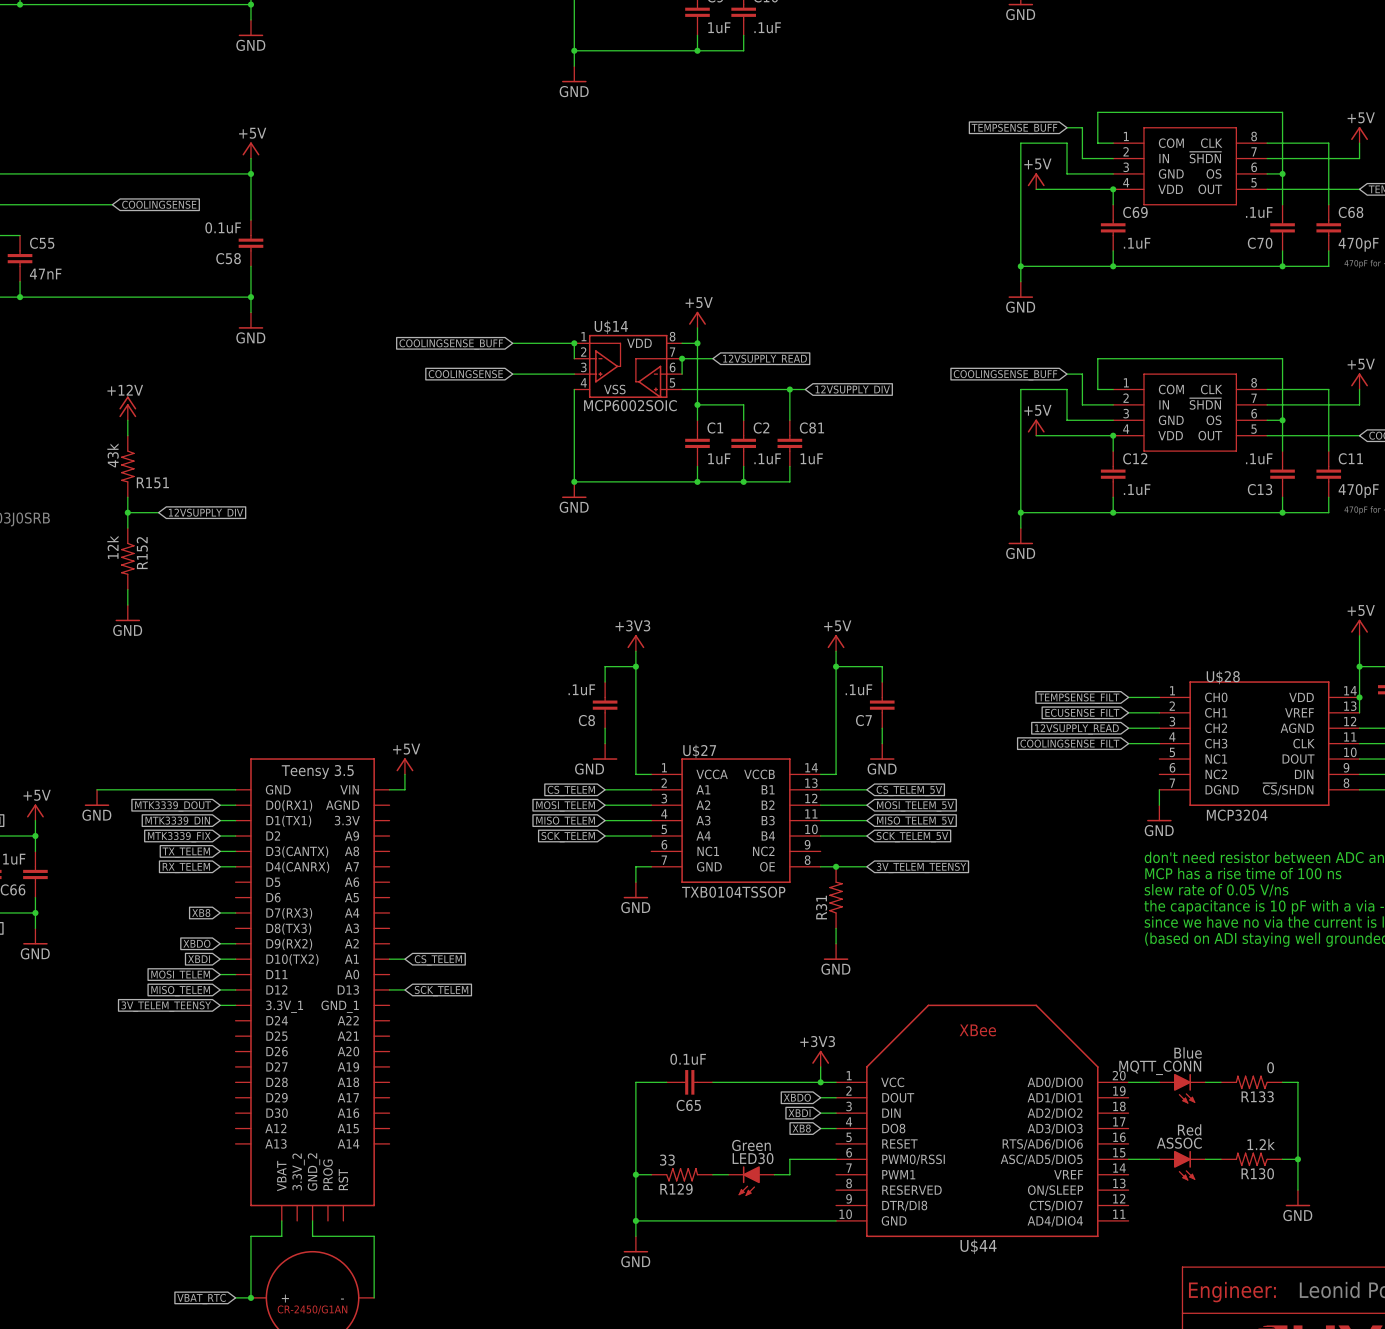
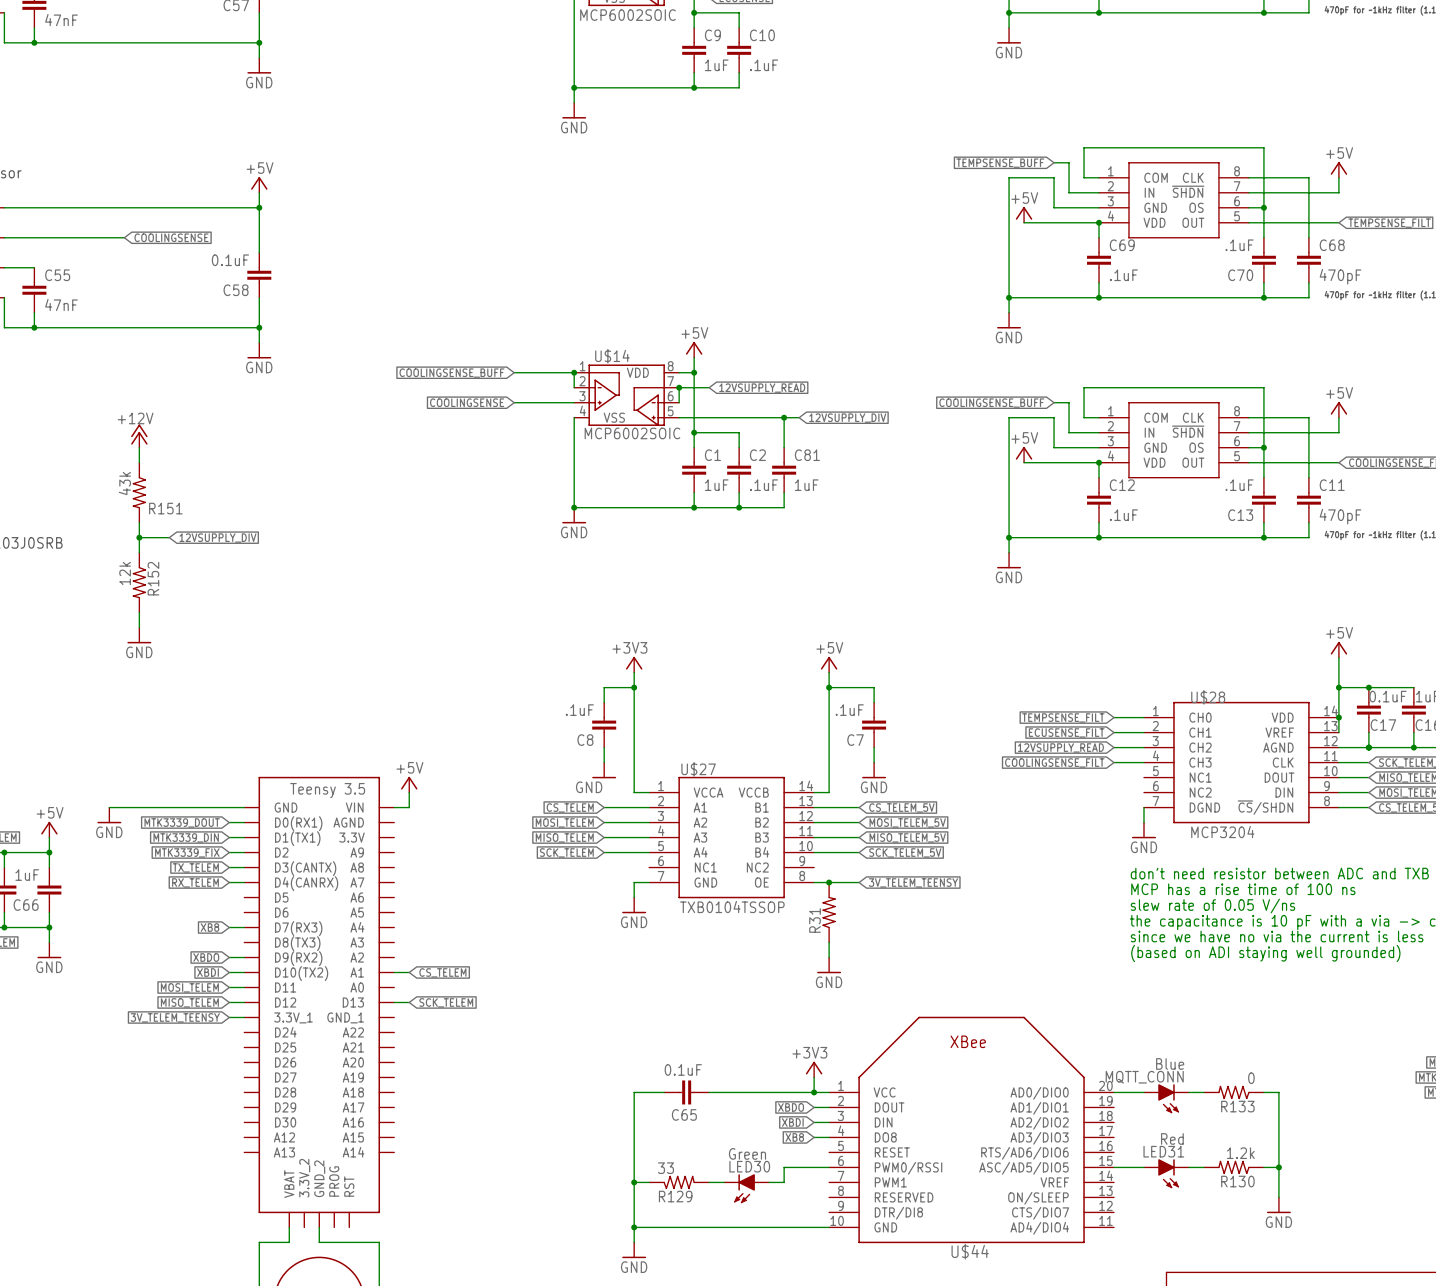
ASSOC name: ASSOC (1179, 1143) -> LED31 (1163, 1151)

